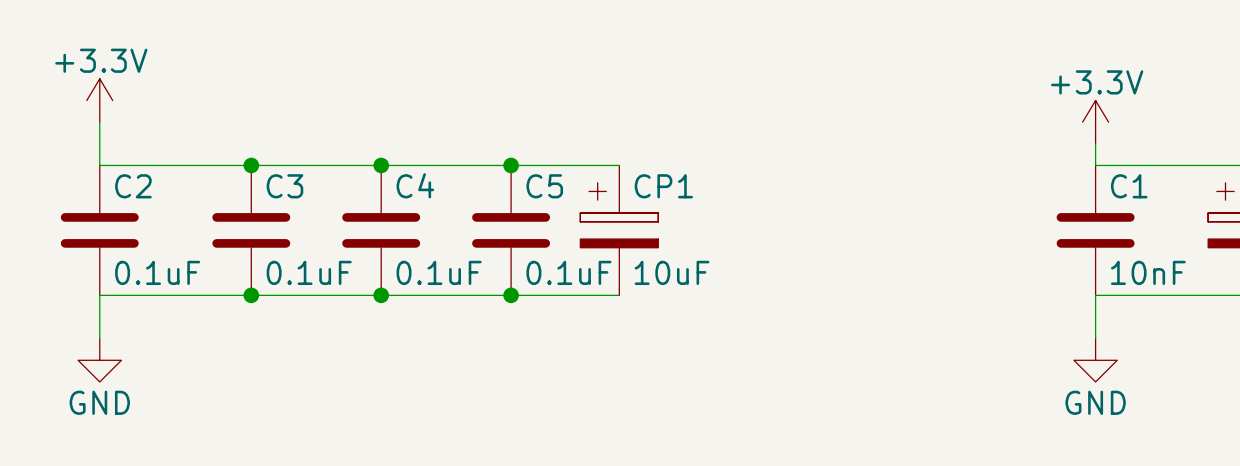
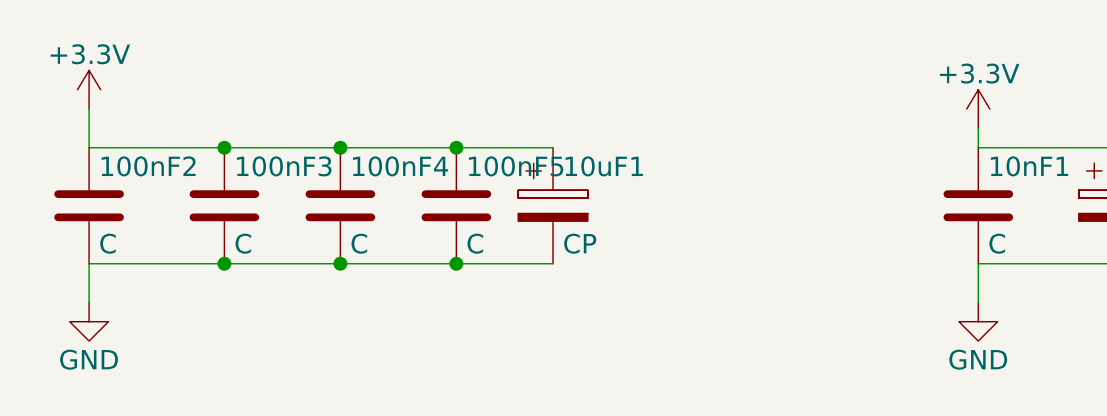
C4 name: C4 (415, 185) -> 100nF4 (400, 166)
C2 name: C2 (133, 186) -> 100nF2 (148, 166)
C3 name: C3 (284, 186) -> 100nF3 (284, 166)
C5 name: C5 (544, 186) -> 100nF5 (516, 166)
CP1 name: CP1 (663, 186) -> 10uF1 (604, 166)
C1 name: C1 (1129, 186) -> 10nF1 (1029, 166)
C2 value: 0.1uF (157, 272) -> C (108, 243)
C3 value: 0.1uF (309, 272) -> C (243, 243)
C4 value: 0.1uF (439, 272) -> C (359, 243)
C5 value: 0.1uF (568, 272) -> C (475, 243)
CP1 value: 10uF (672, 272) -> CP (580, 243)
C1 value: 10nF (1148, 272) -> C (997, 243)

